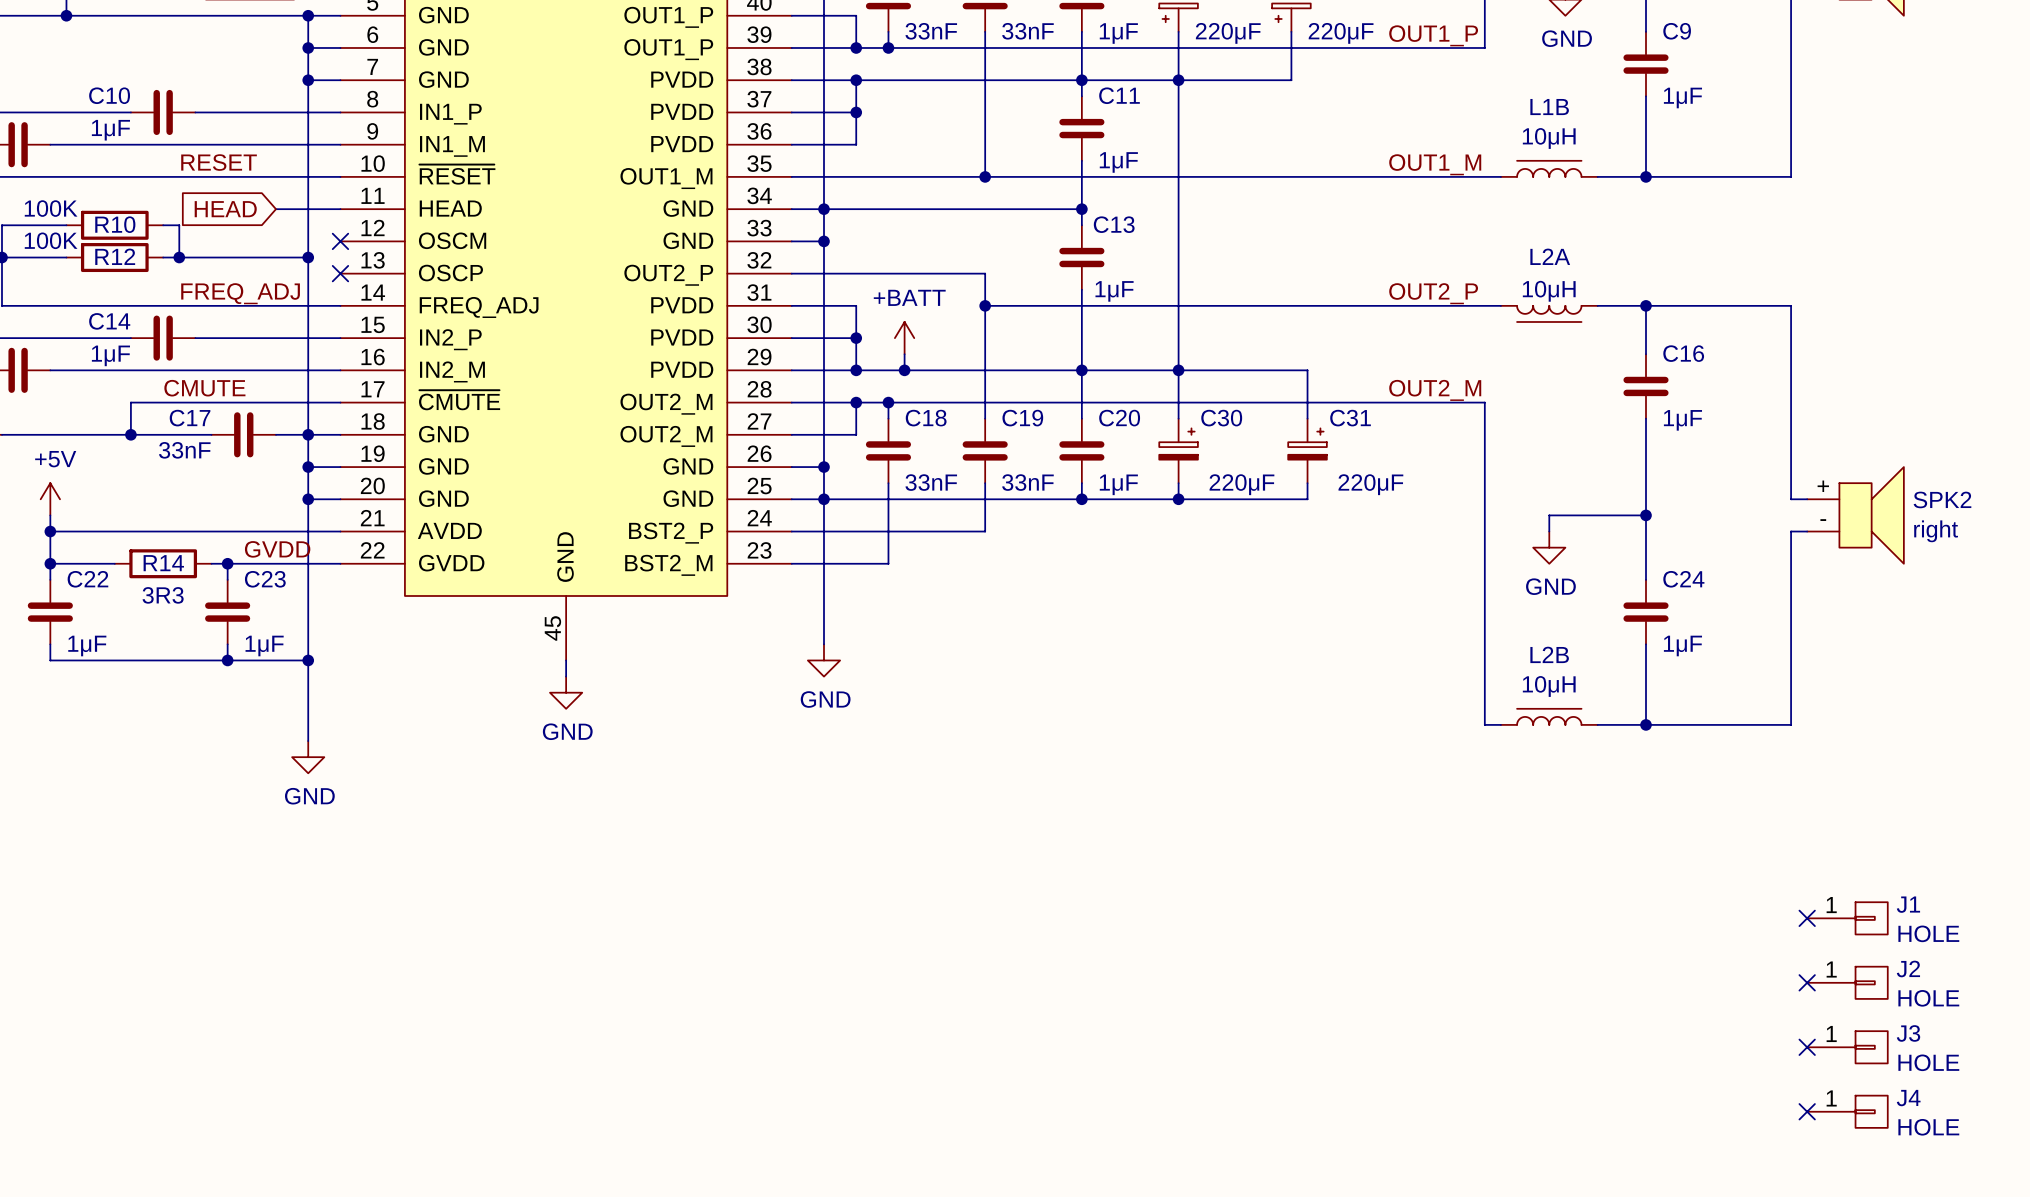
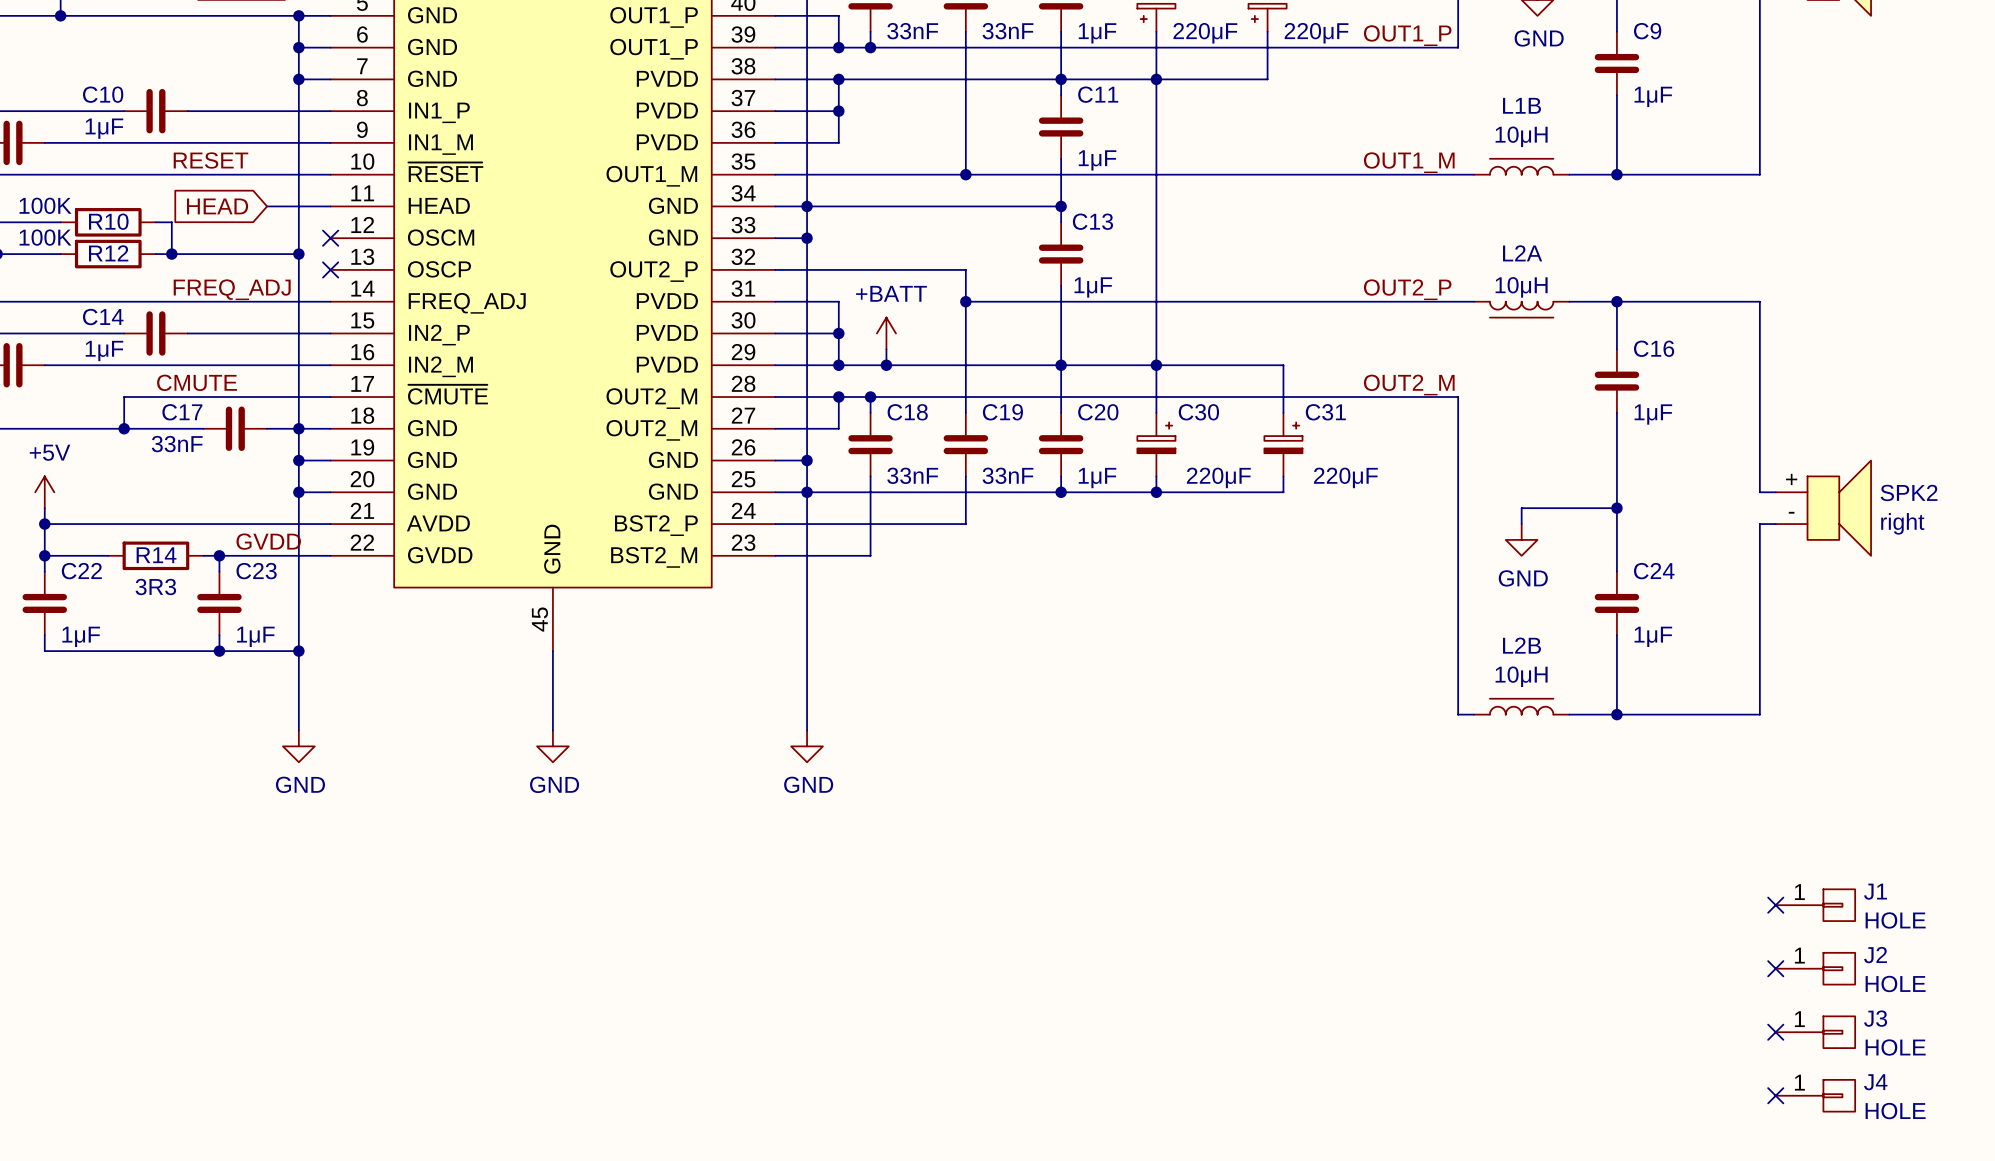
wire: none -> (807, 635) (807, 730)
power symbol position: GND (823, 660) -> GND (807, 746)
wire: none -> (552, 666) (552, 730)
power symbol position: GND (566, 692) -> GND (552, 746)

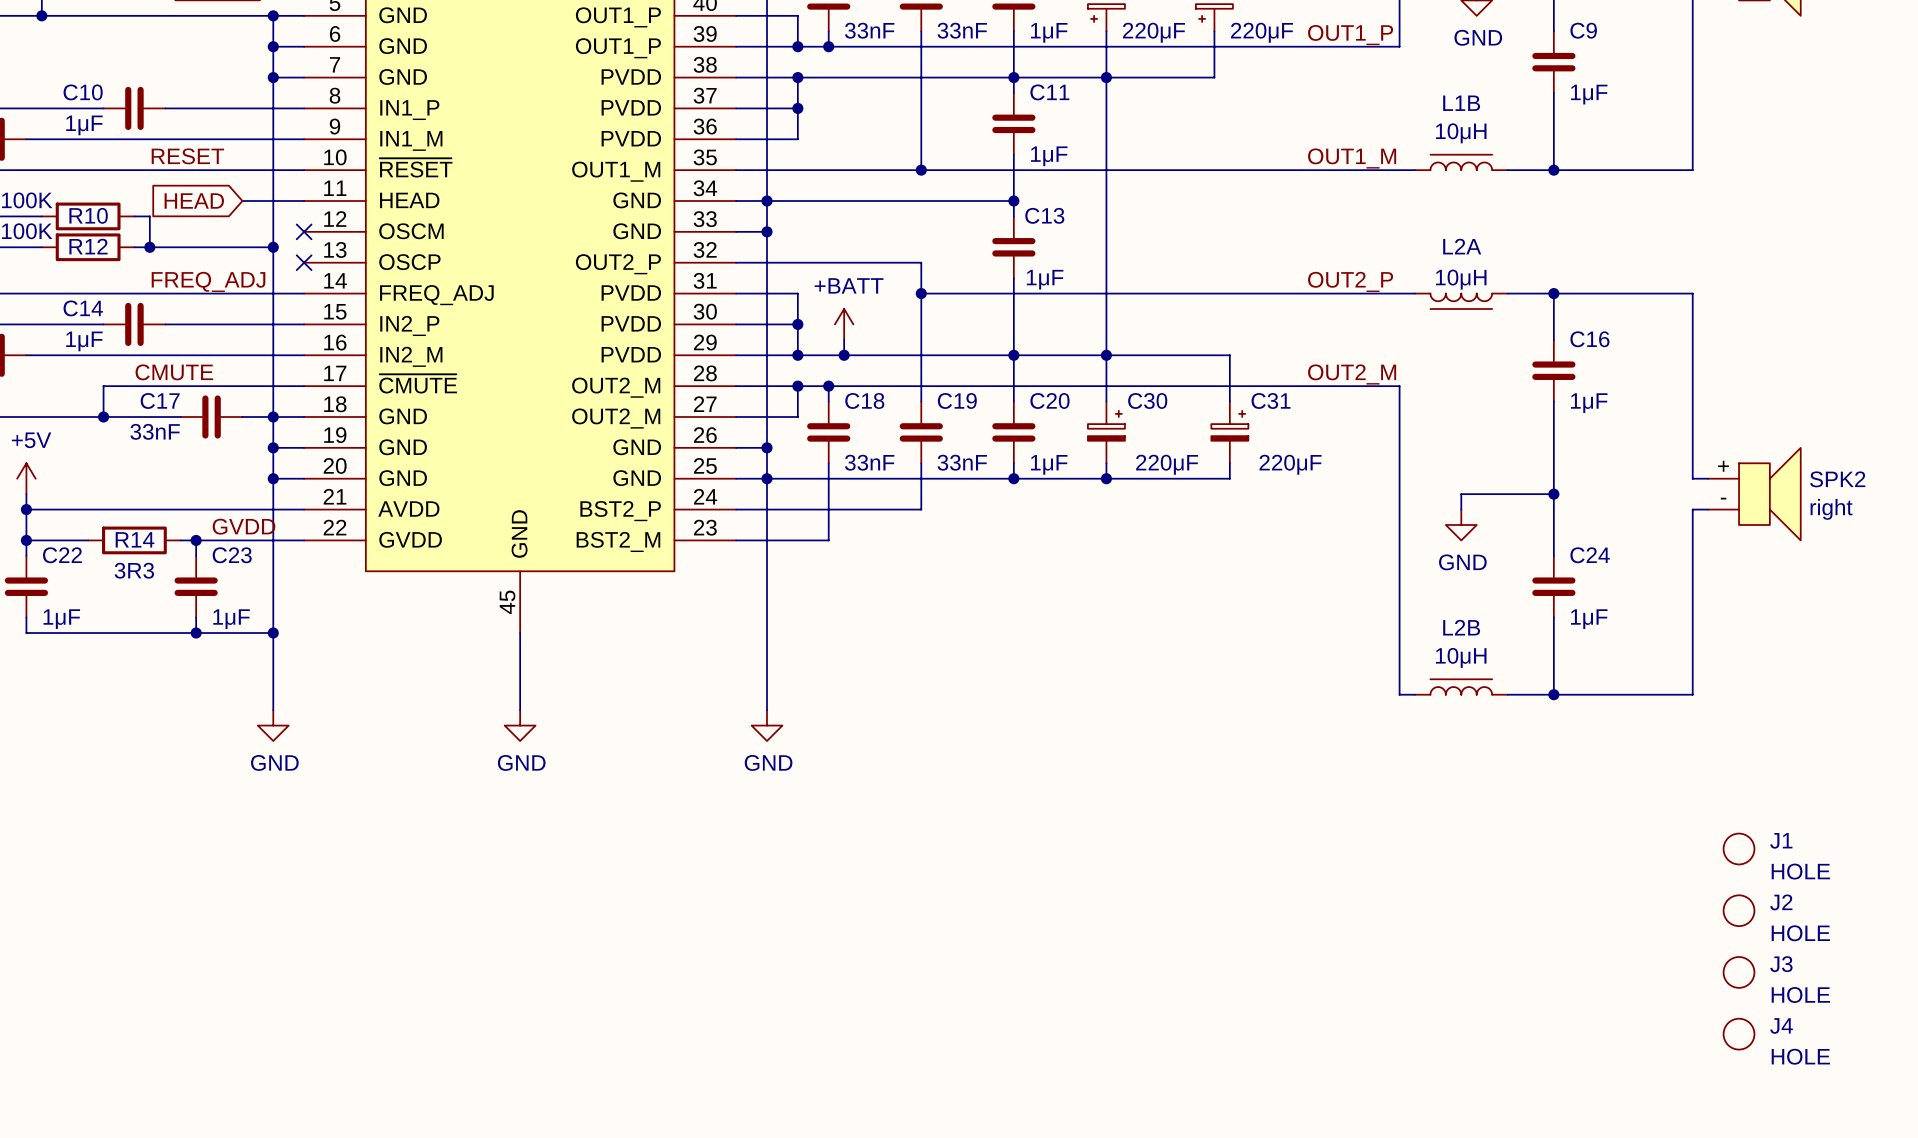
J1 symbol: [1775, 889, 1856, 922] -> [1723, 833, 1755, 865]
no-connect mark: (1775, 905) -> none
J2 symbol: [1775, 952, 1856, 985] -> [1723, 895, 1755, 927]
no-connect mark: (1775, 968) -> none
J3 symbol: [1775, 1016, 1856, 1049] -> [1723, 957, 1755, 988]
no-connect mark: (1775, 1032) -> none
J4 symbol: [1775, 1079, 1856, 1112] -> [1723, 1018, 1755, 1050]
no-connect mark: (1775, 1095) -> none

